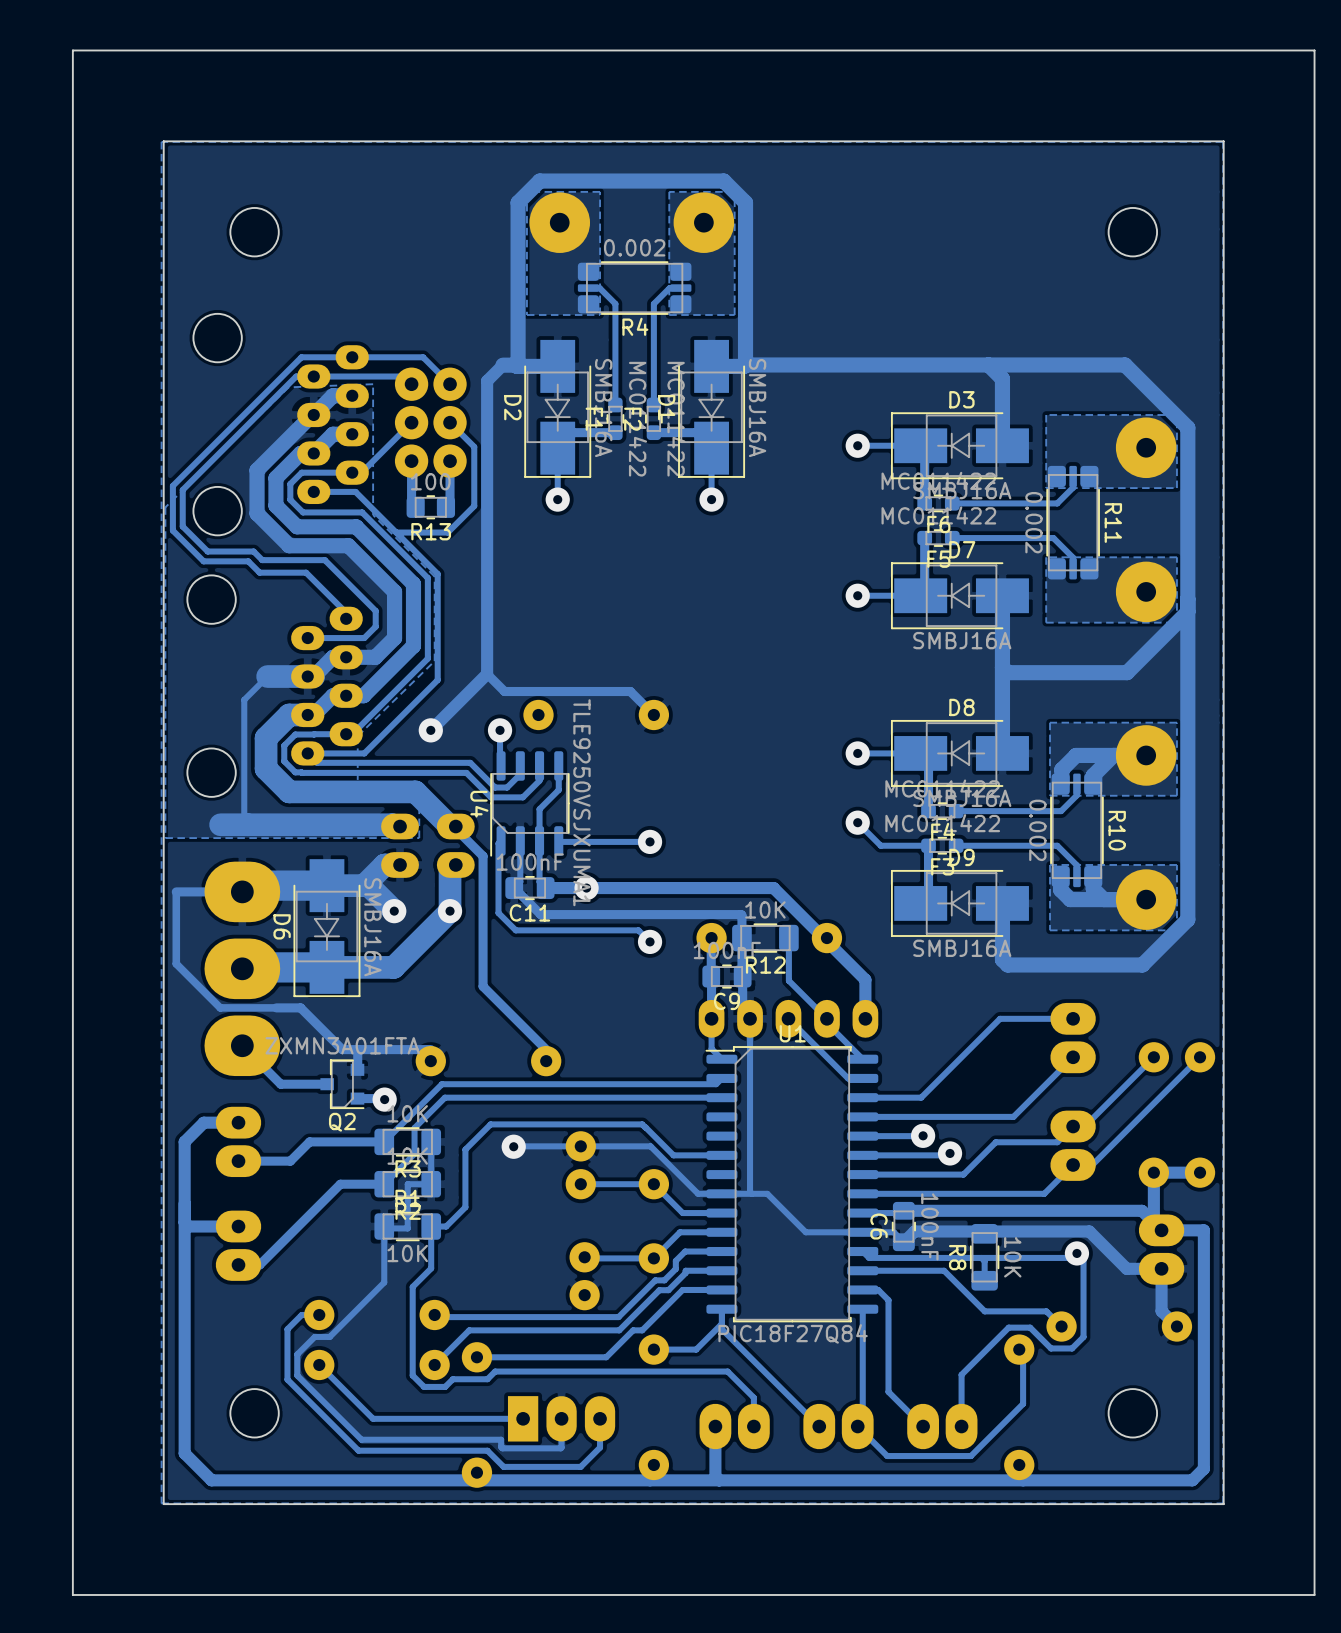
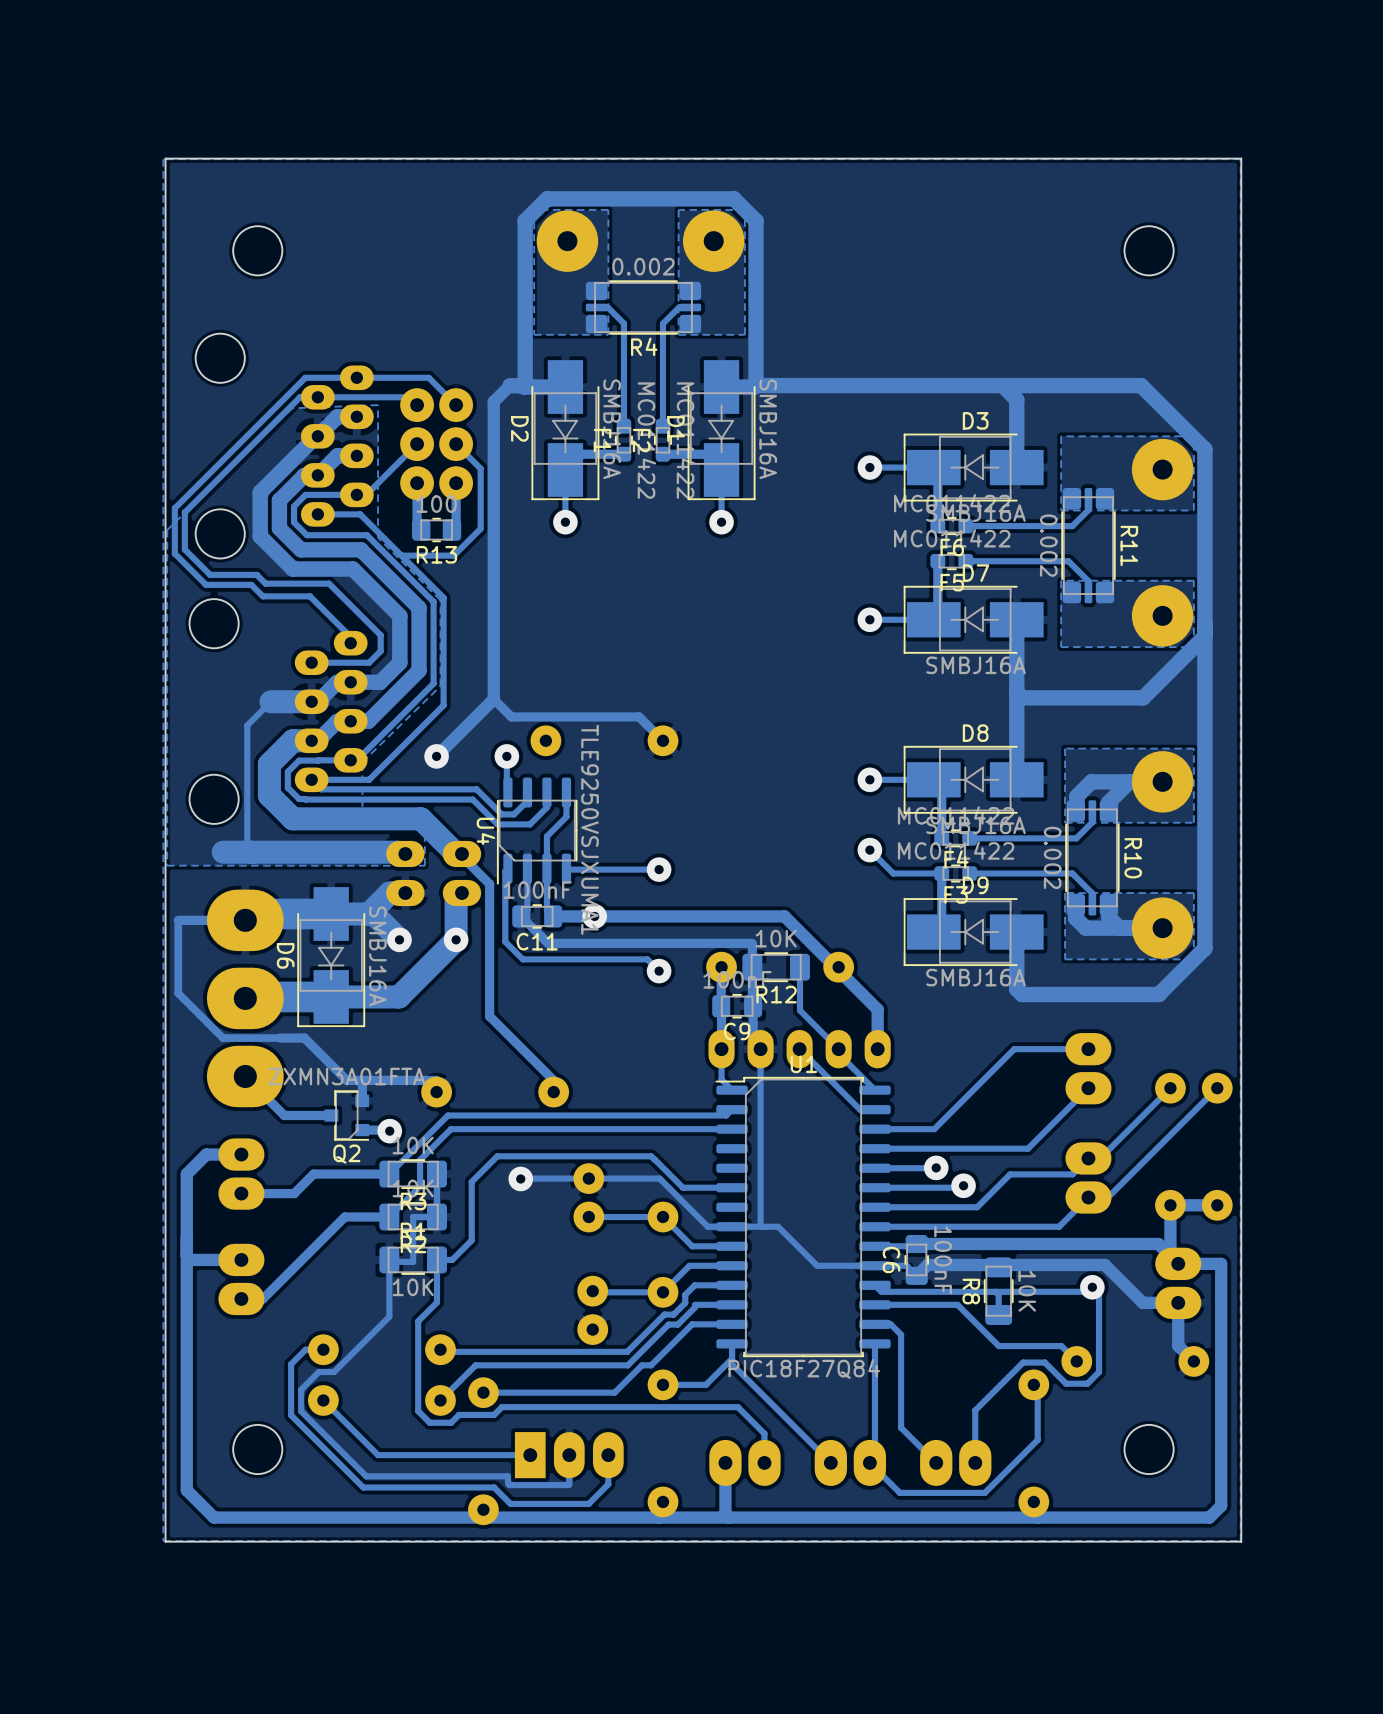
board edge: (1314, 50) (1314, 1594) (72, 1594) (72, 50) (1314, 50) -> none

